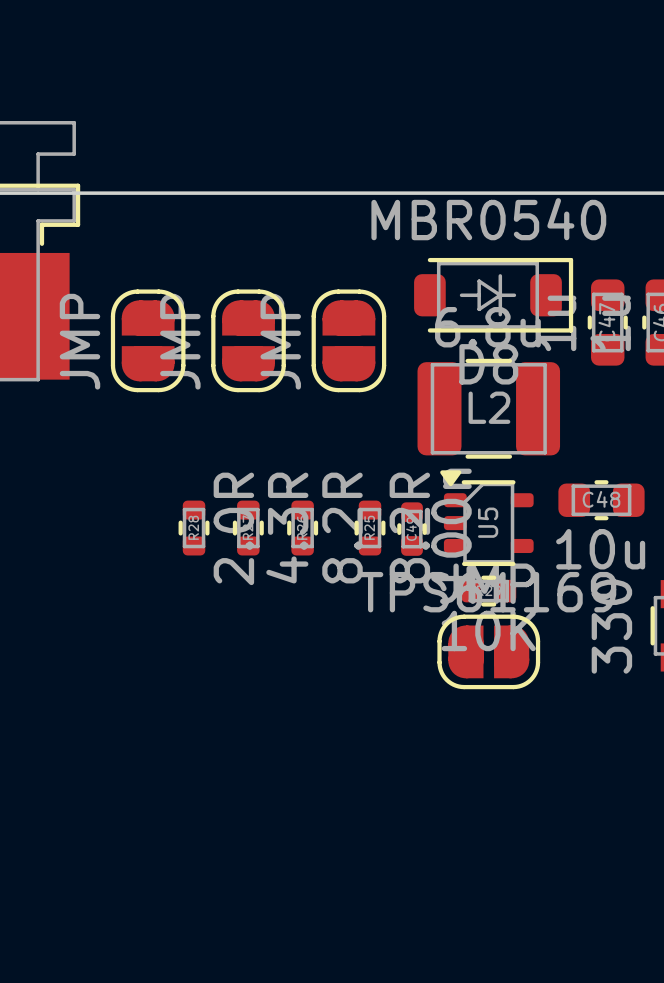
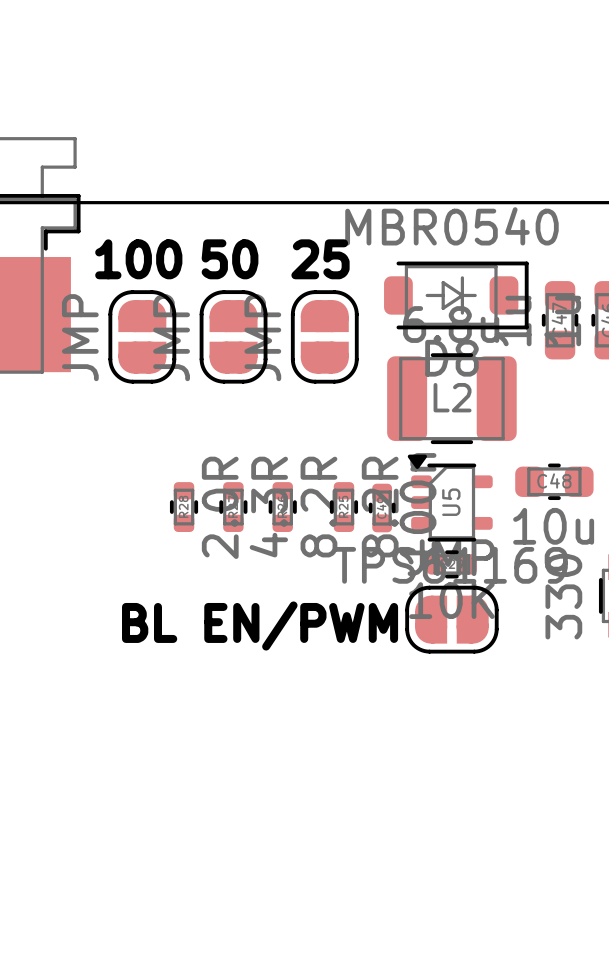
text: none -> 100 (138, 259)
text: none -> 50 (230, 259)
text: none -> 25 (320, 259)
text: none -> BL EN/PWM (260, 626)

